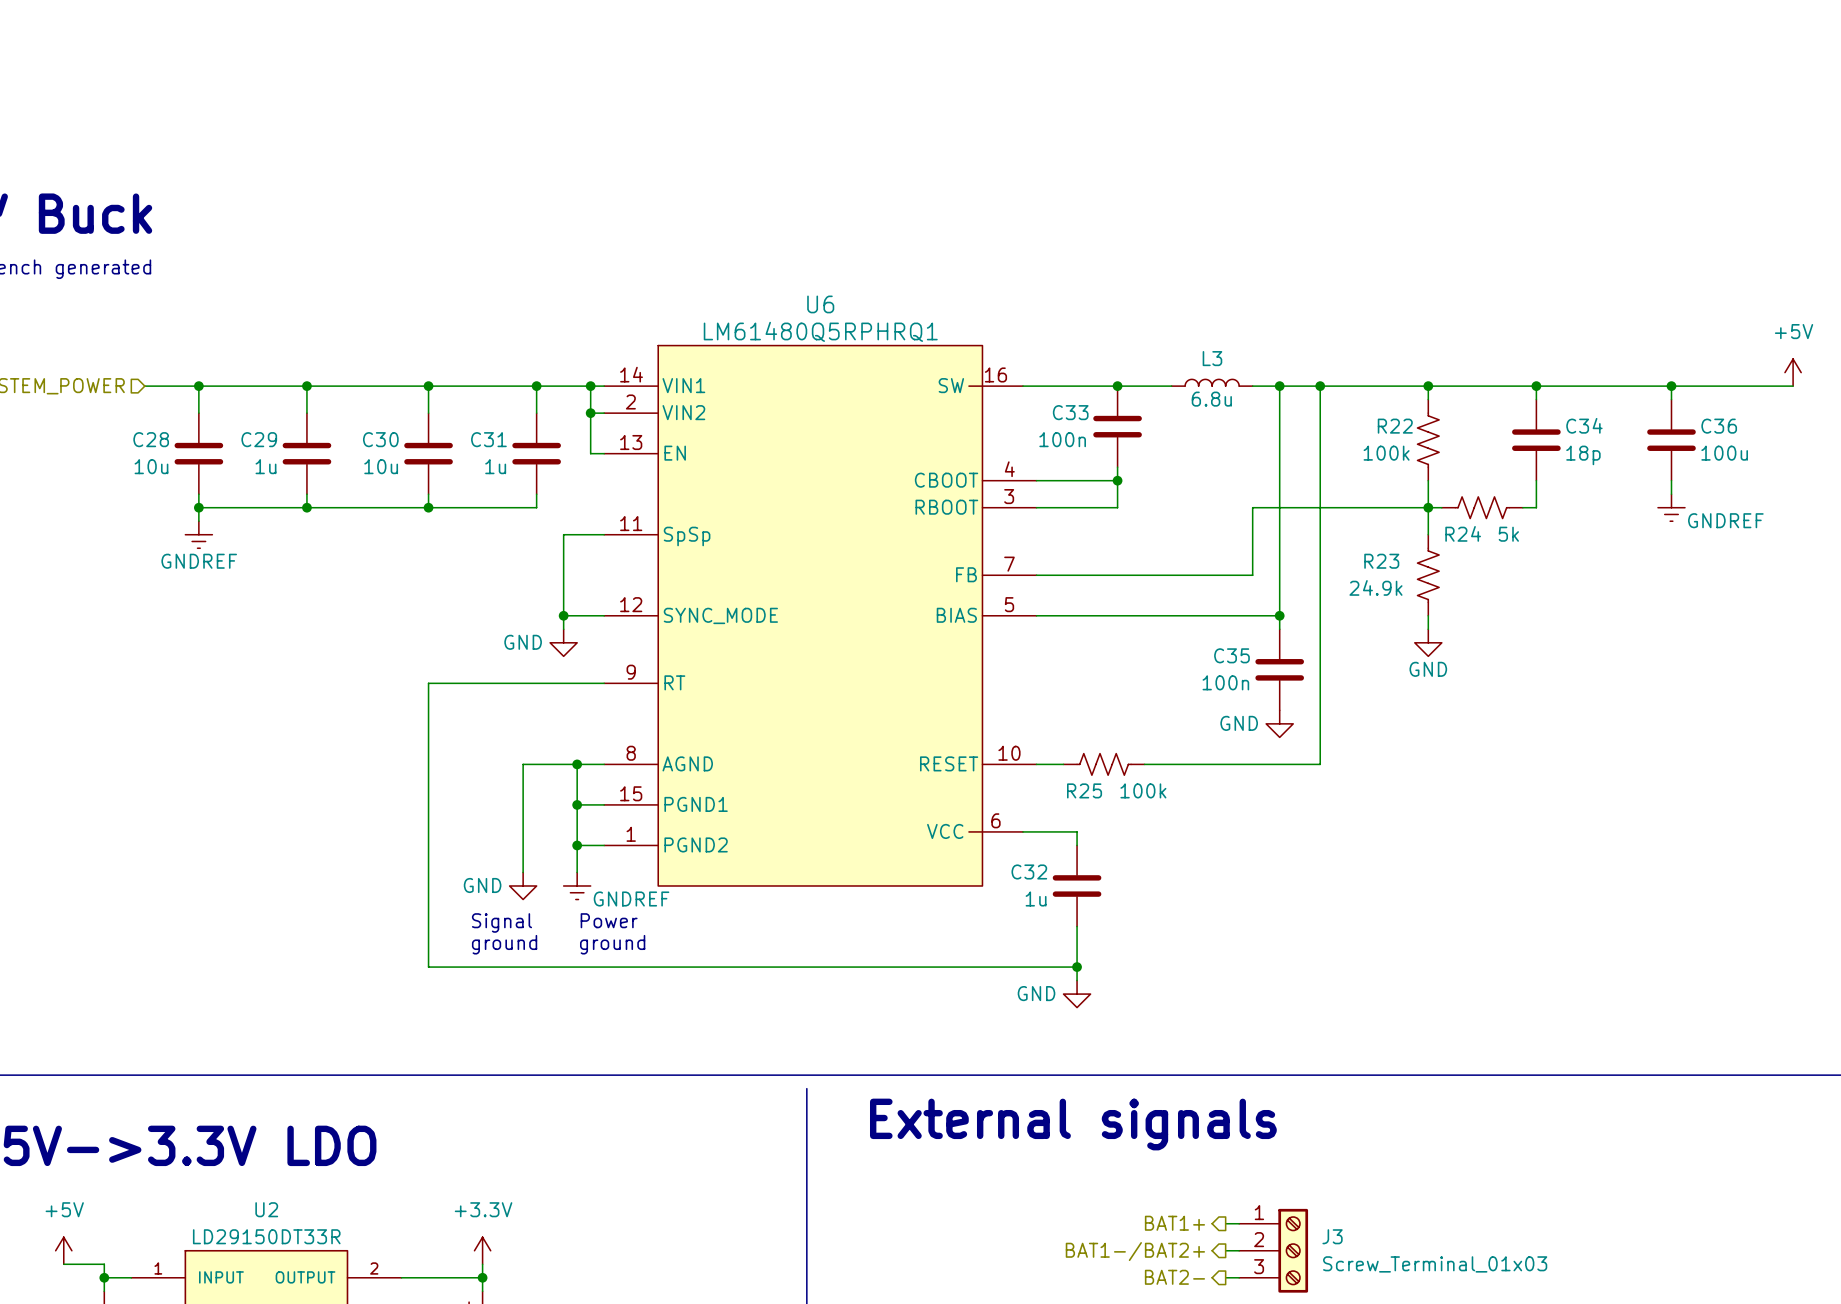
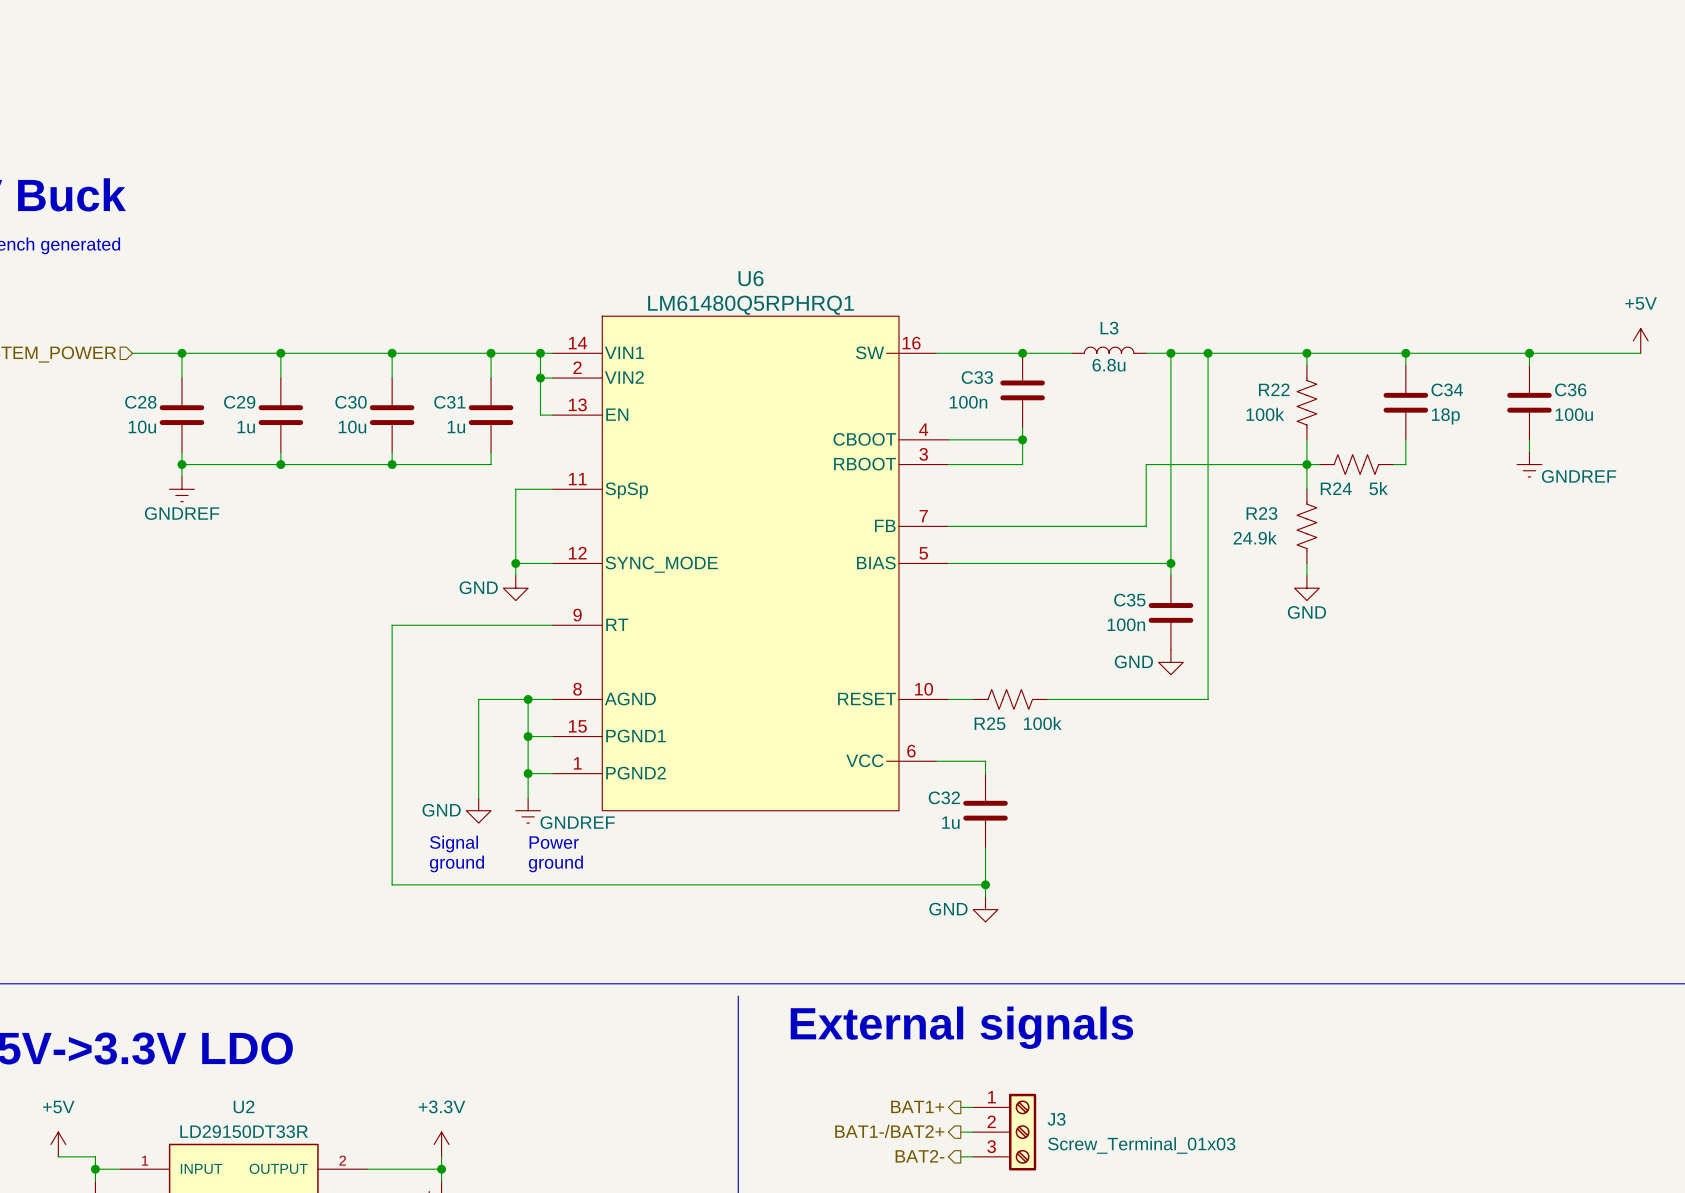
hierarchical label position: BAT1+ (1174, 1223) -> BAT1+ (917, 1106)
wire: (1225, 1223) (1239, 1223) -> (960, 1107) (973, 1107)
wire: (1225, 1250) (1239, 1250) -> (960, 1156) (973, 1156)
J3 position: (1273, 1250) -> (1004, 1132)
hierarchical label position: BAT1-/BAT2+ (1135, 1251) -> BAT1-/BAT2+ (889, 1131)
hierarchical label position: BAT2- (1174, 1277) -> BAT2- (919, 1156)
wire: (1225, 1277) (1239, 1277) -> (960, 1132) (973, 1132)

